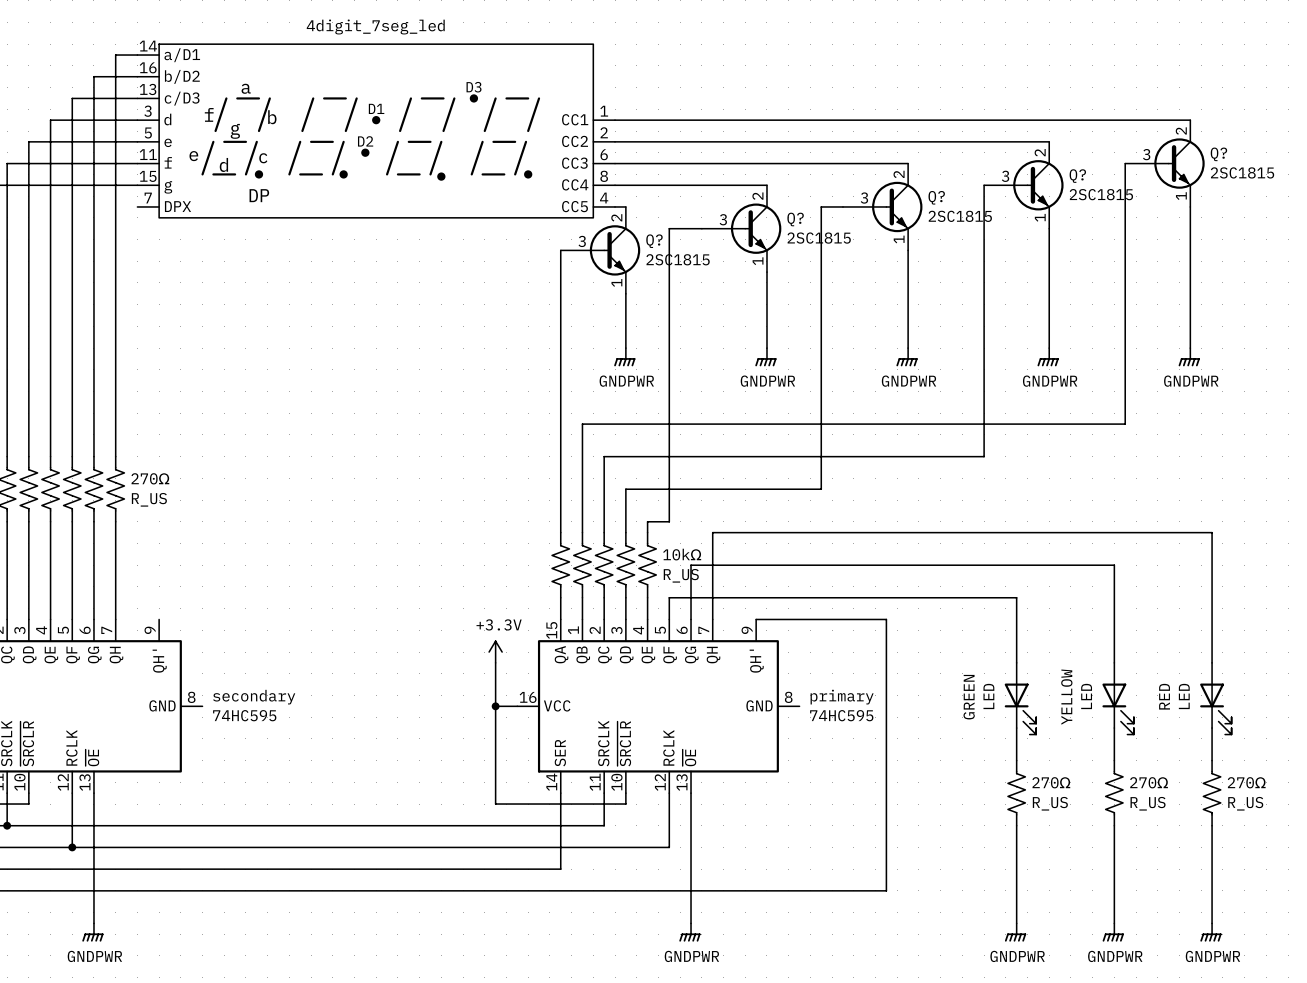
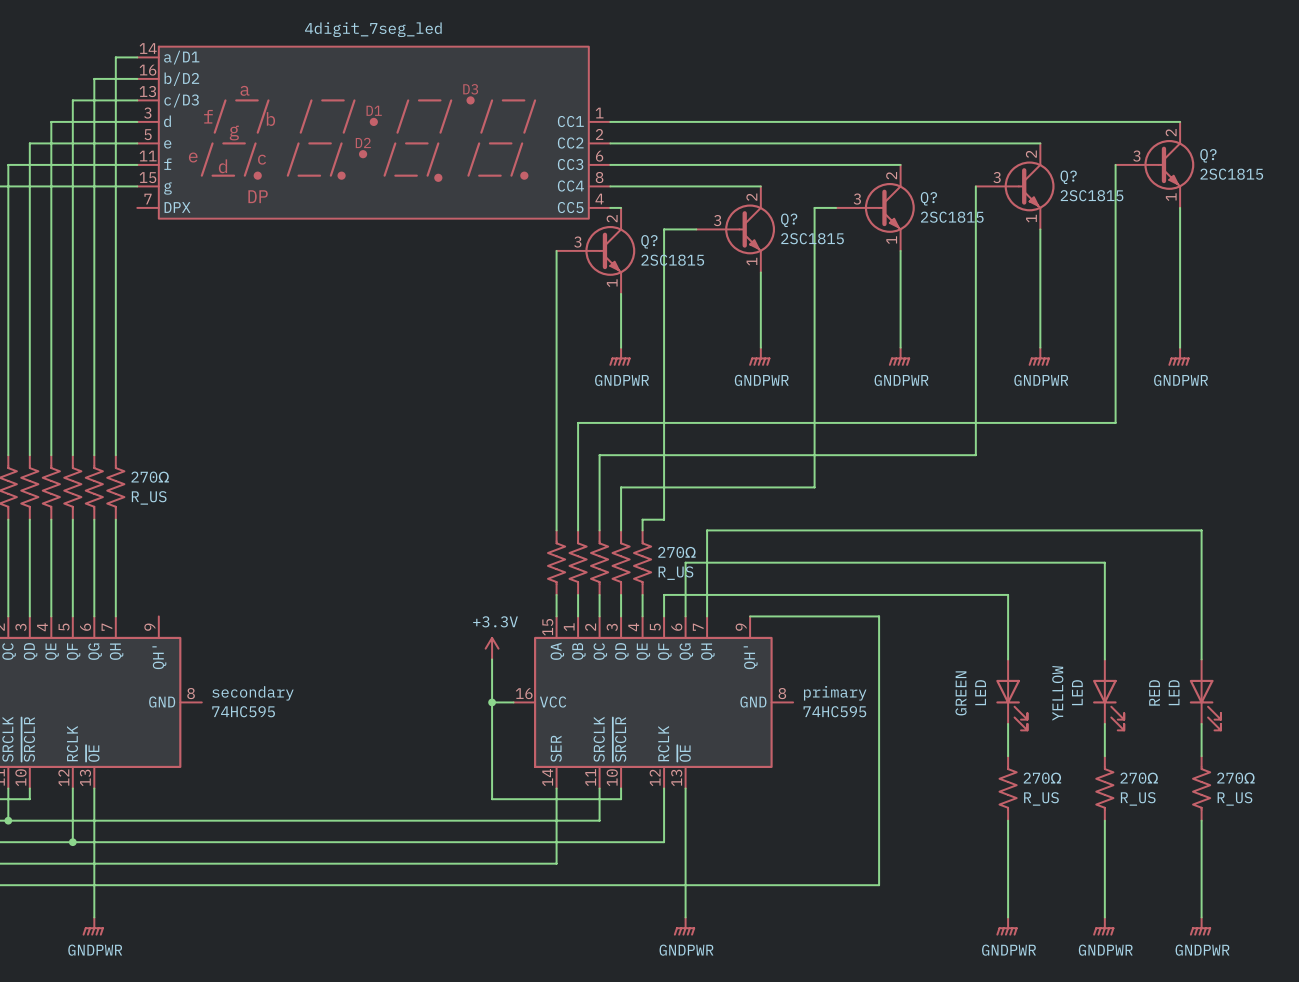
10kΩ name: 10kΩ (682, 554) -> 270Ω (676, 552)

